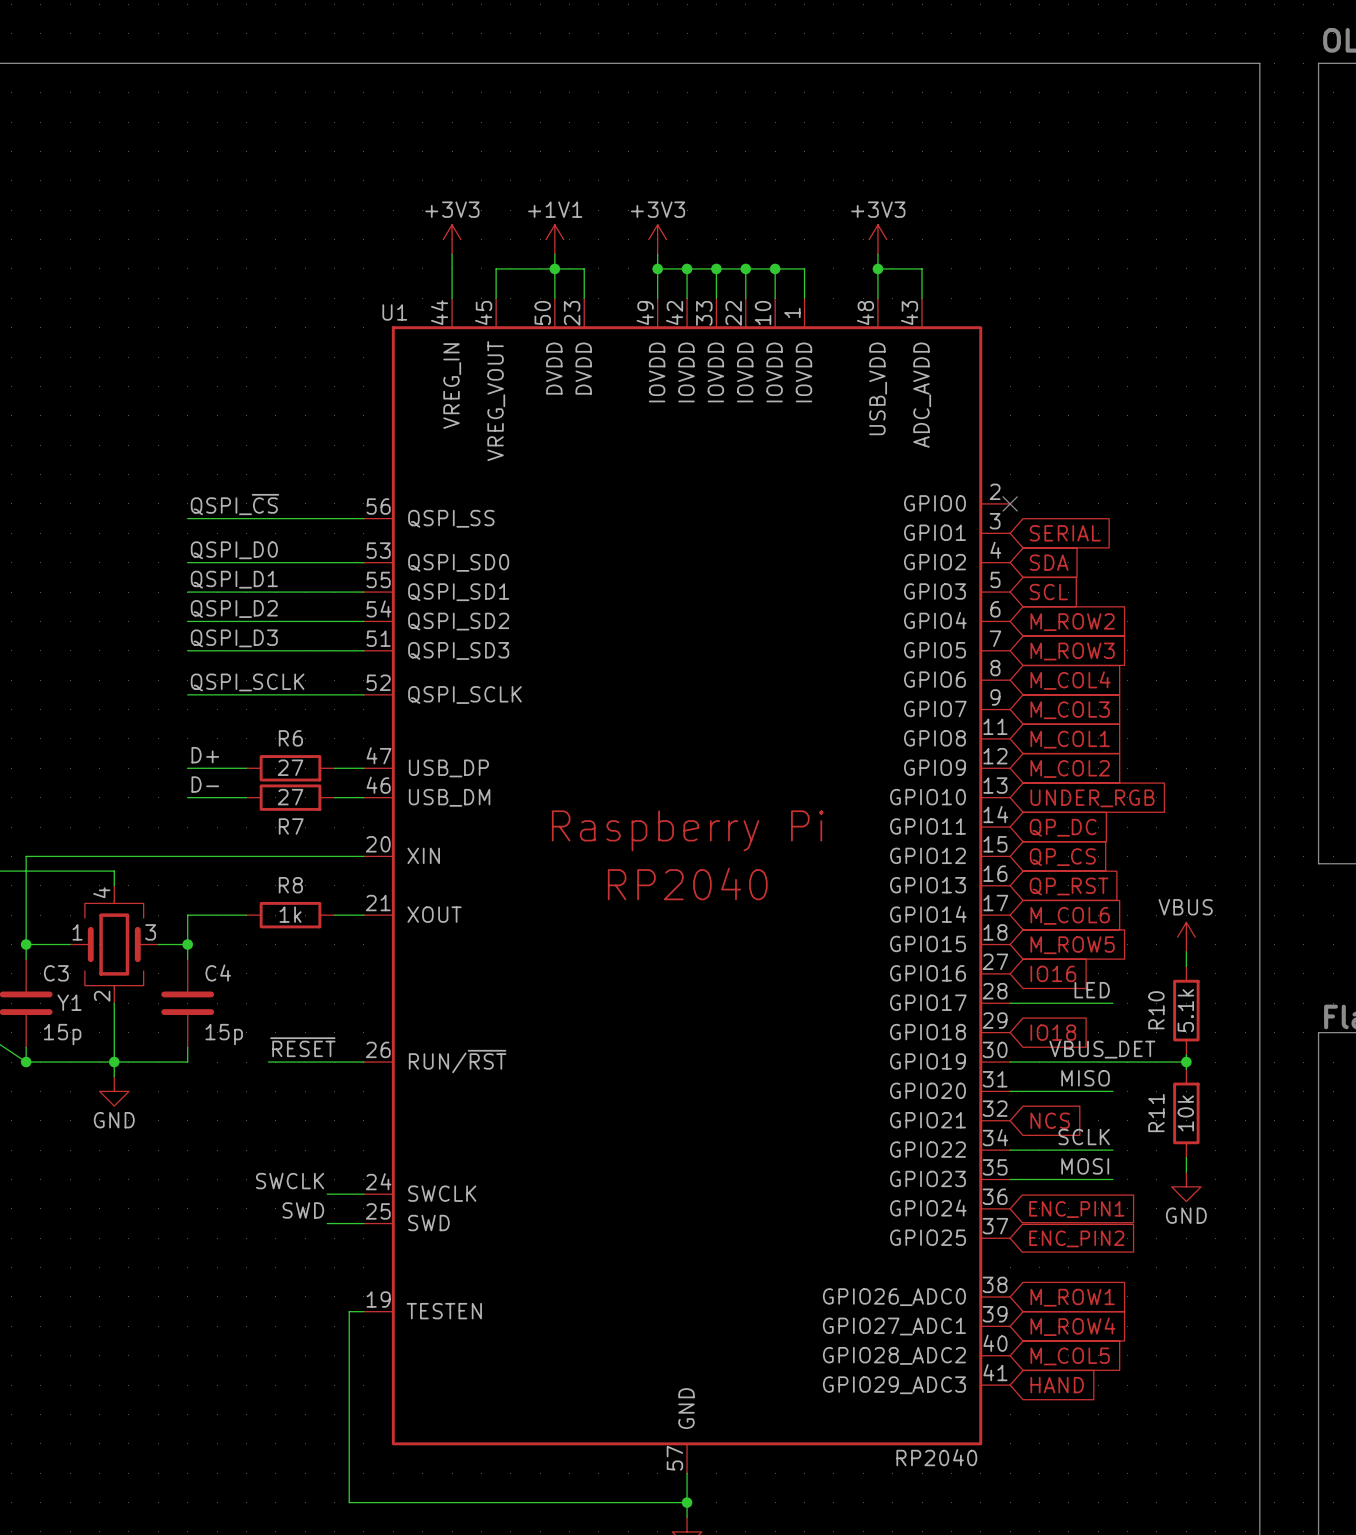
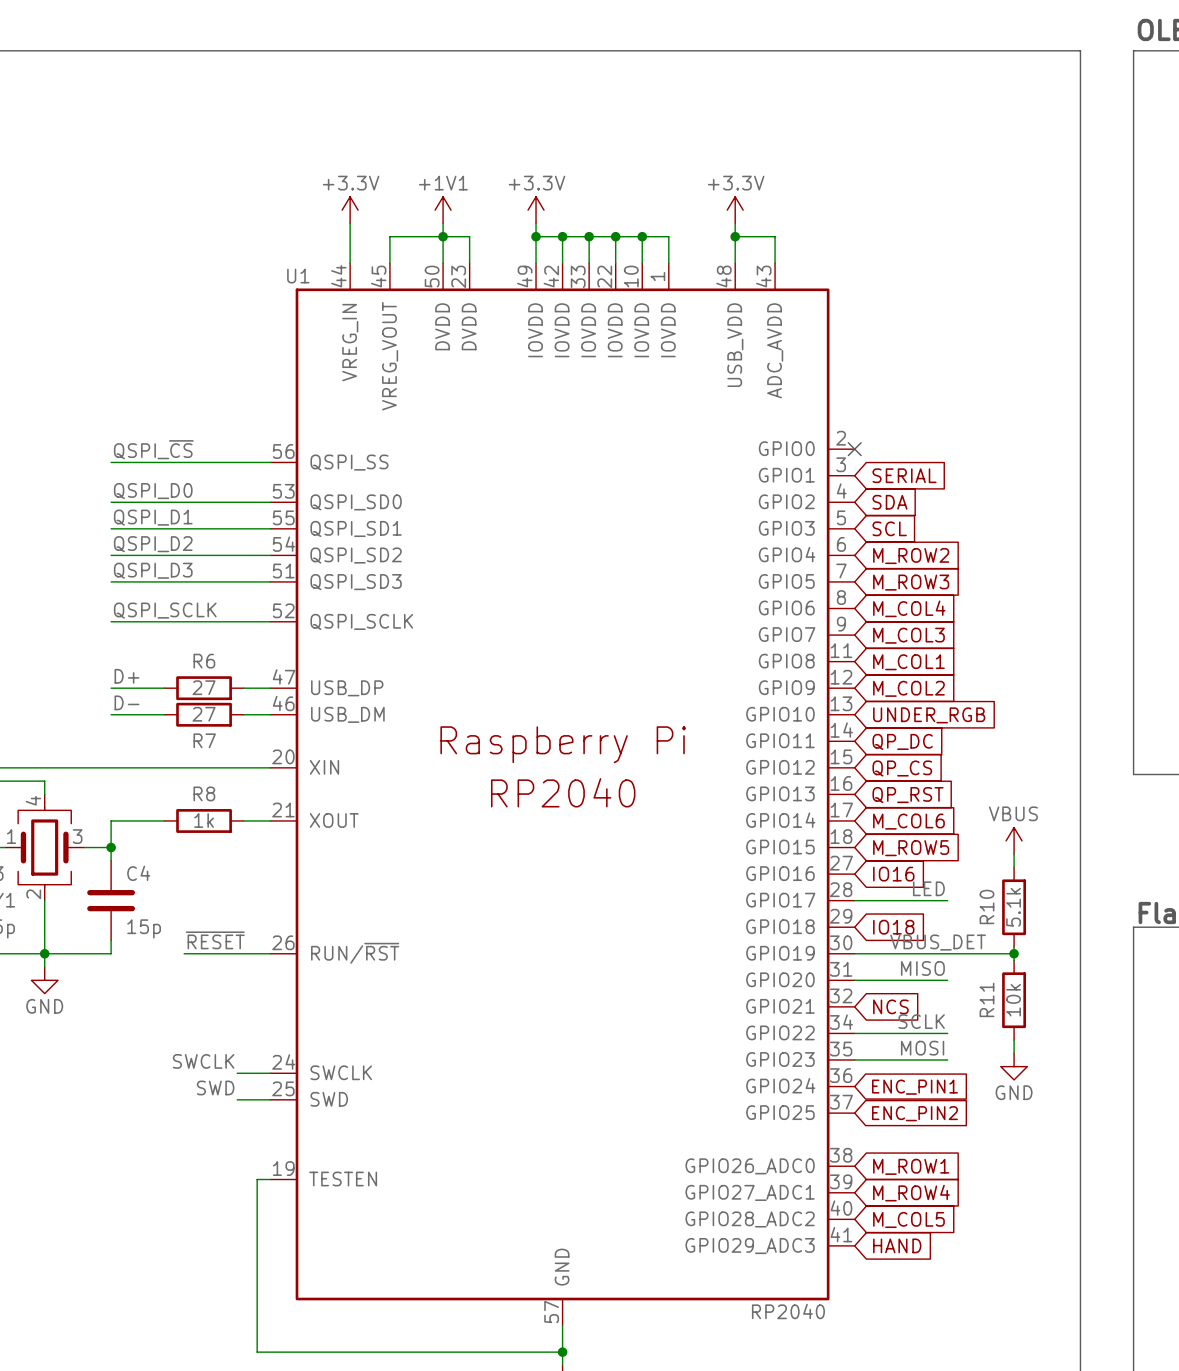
power symbol: +3V3 (452, 239) -> +3.3V (350, 210)
power symbol: +3V3 (657, 239) -> +3.3V (536, 210)
power symbol: +3V3 (877, 239) -> +3.3V (735, 210)

